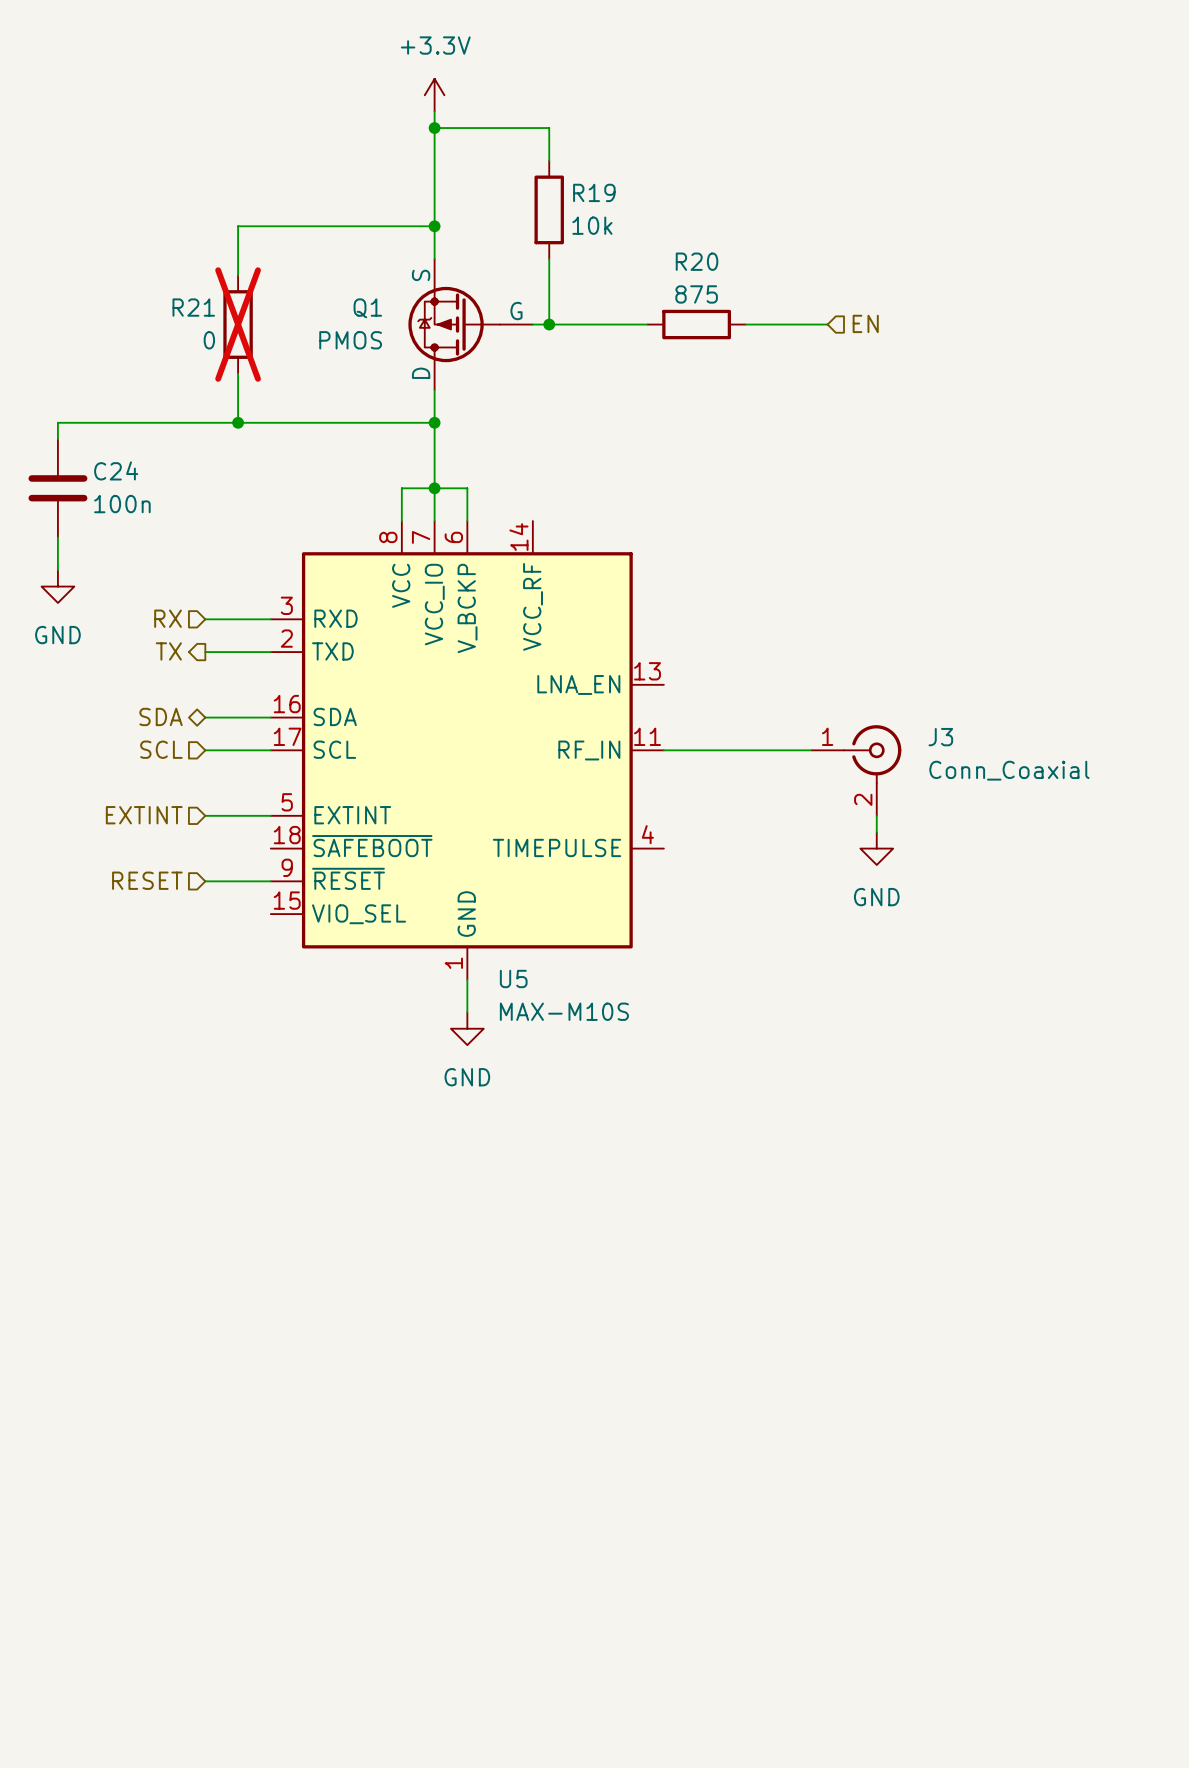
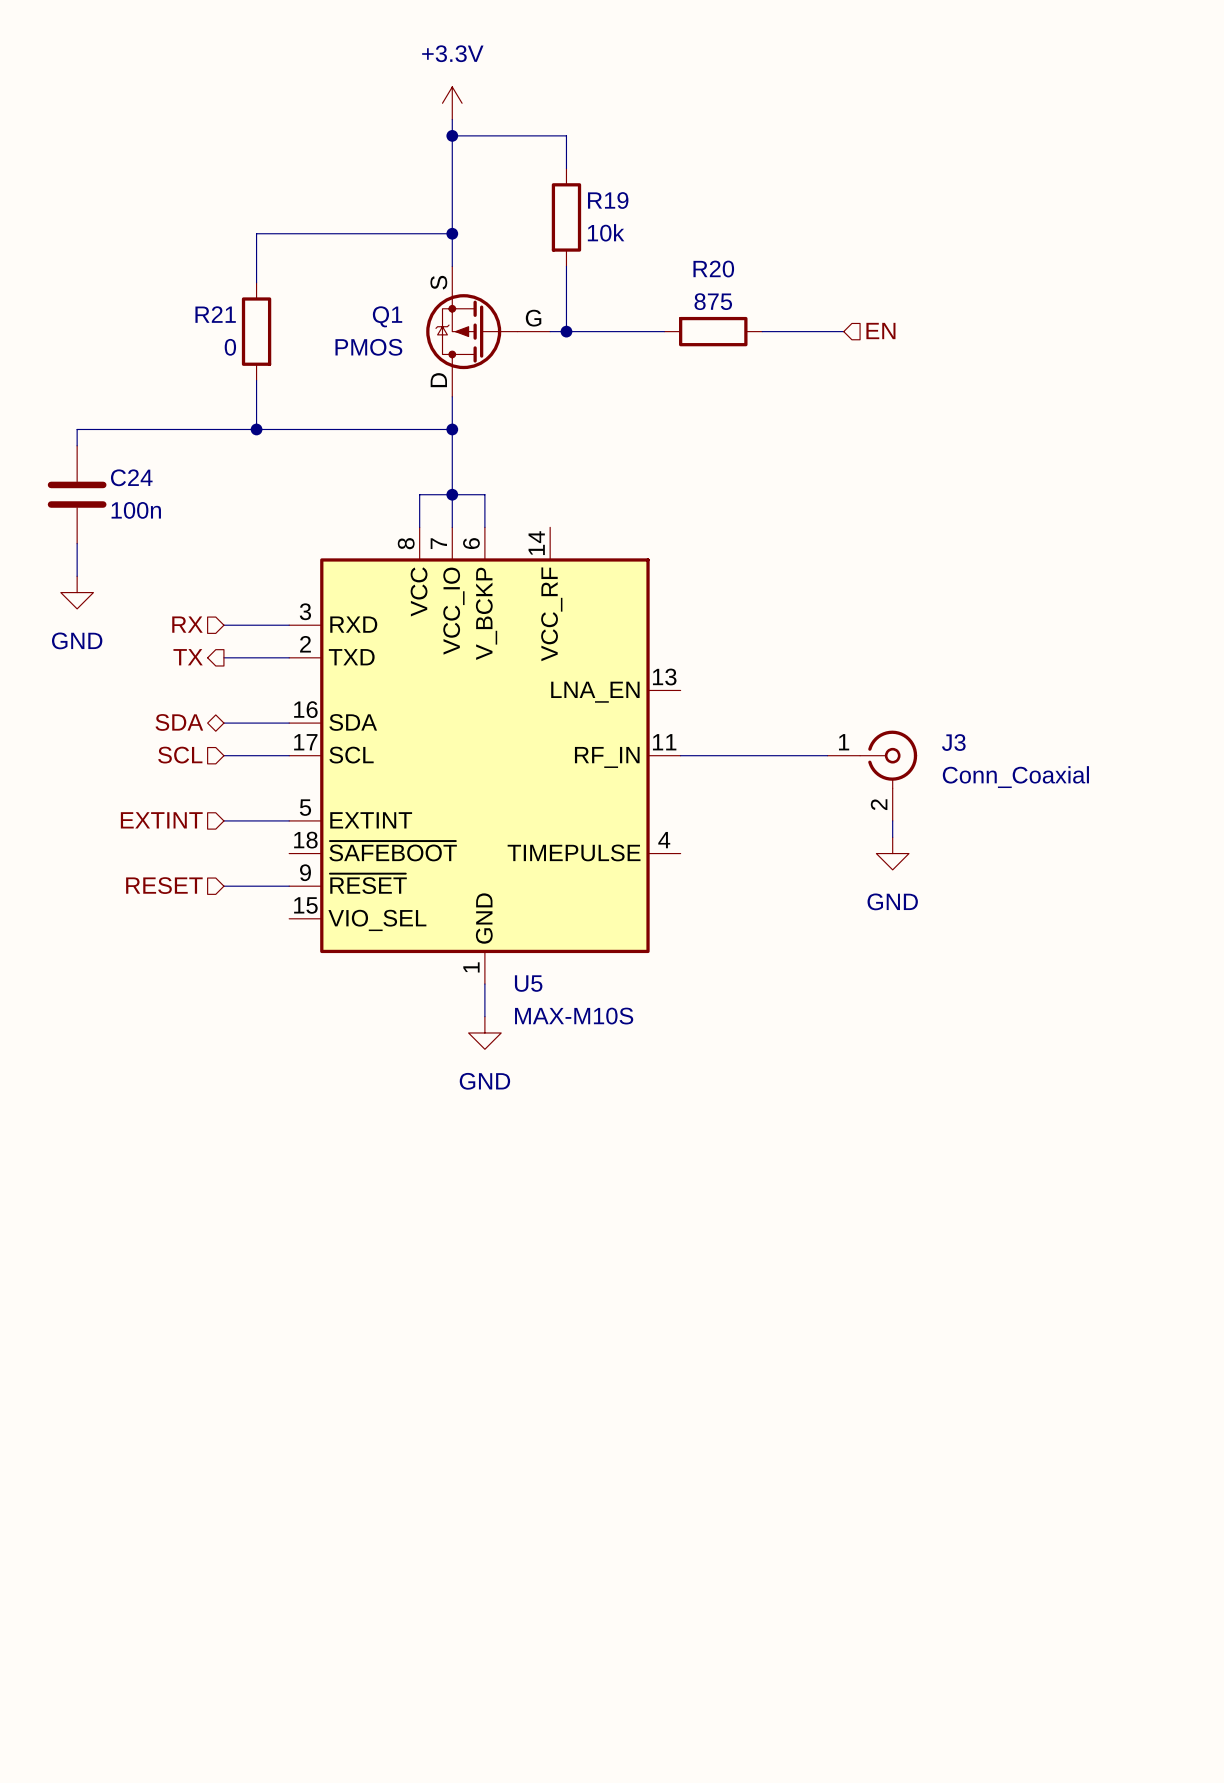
R21 do-not-place cross: (238, 324) -> none

